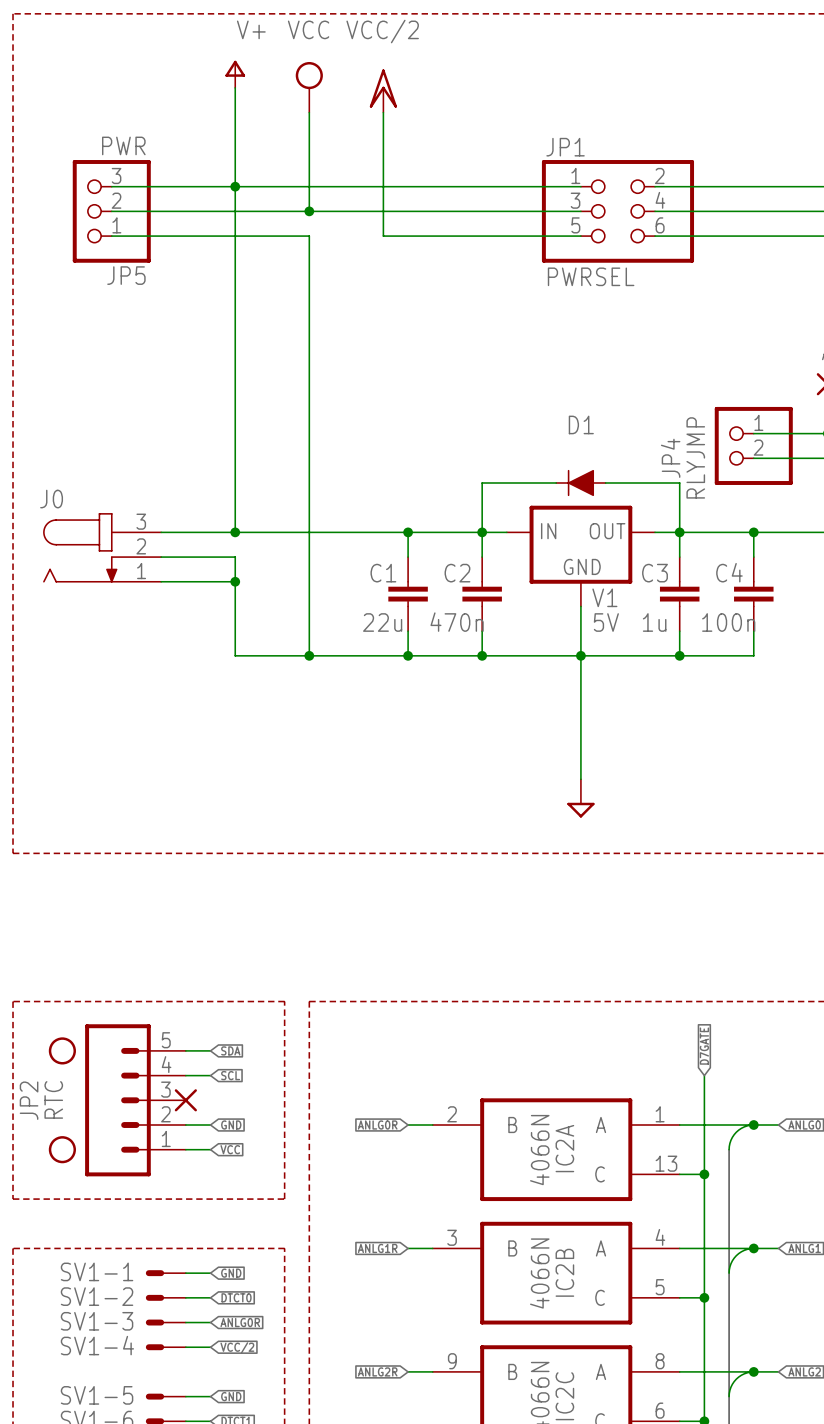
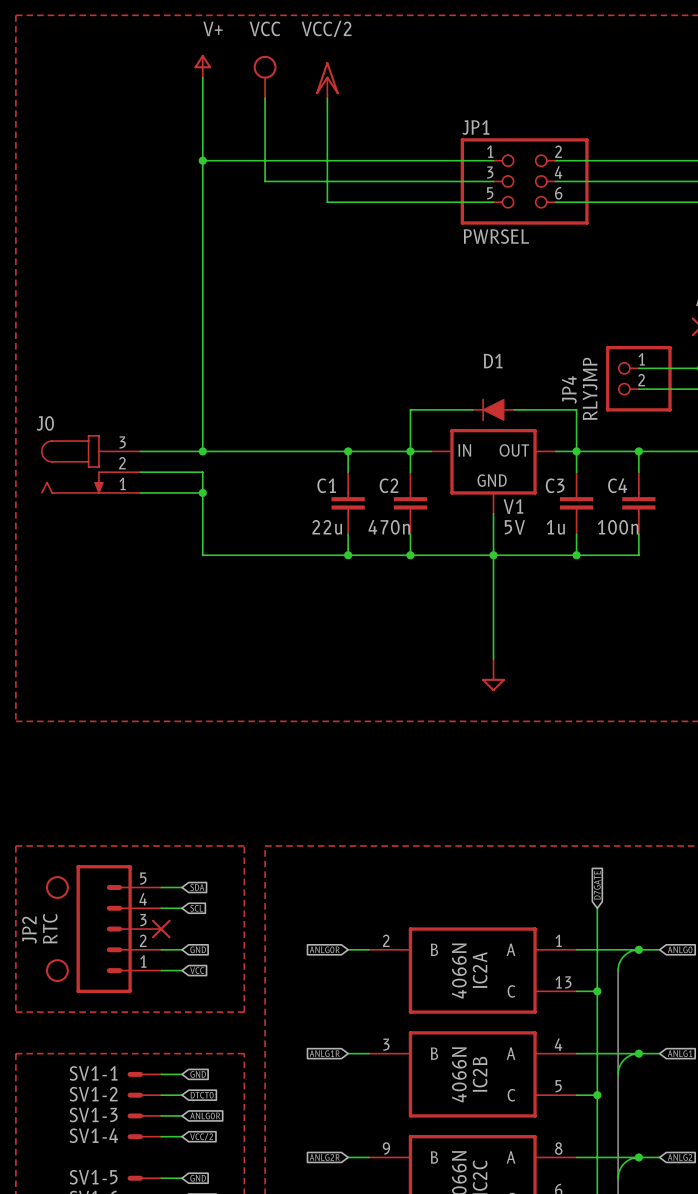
wire: (111, 186) (235, 186) -> none
wire: (111, 211) (309, 211) -> none
JP5: PWR (111, 211) -> none
junction: (309, 211) -> none
wire: (111, 236) (309, 236) (309, 655) -> none
junction: (309, 655) -> none

